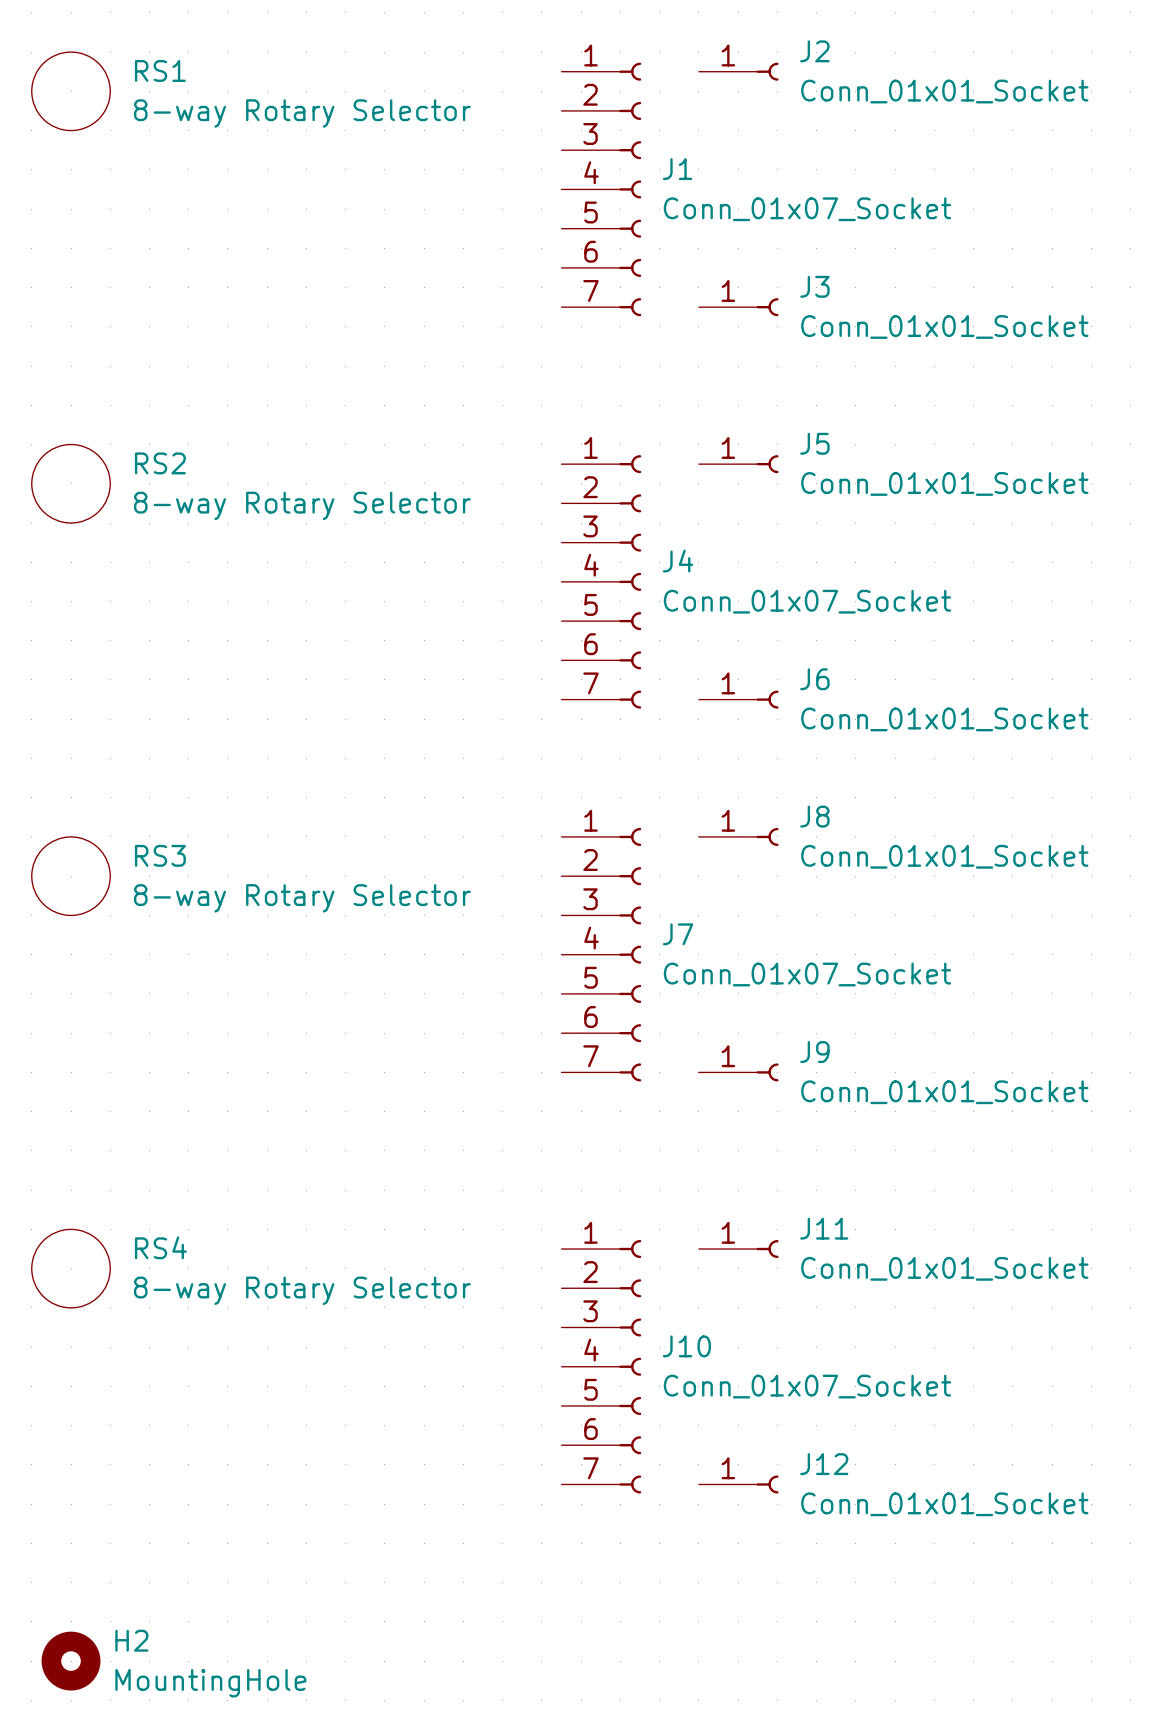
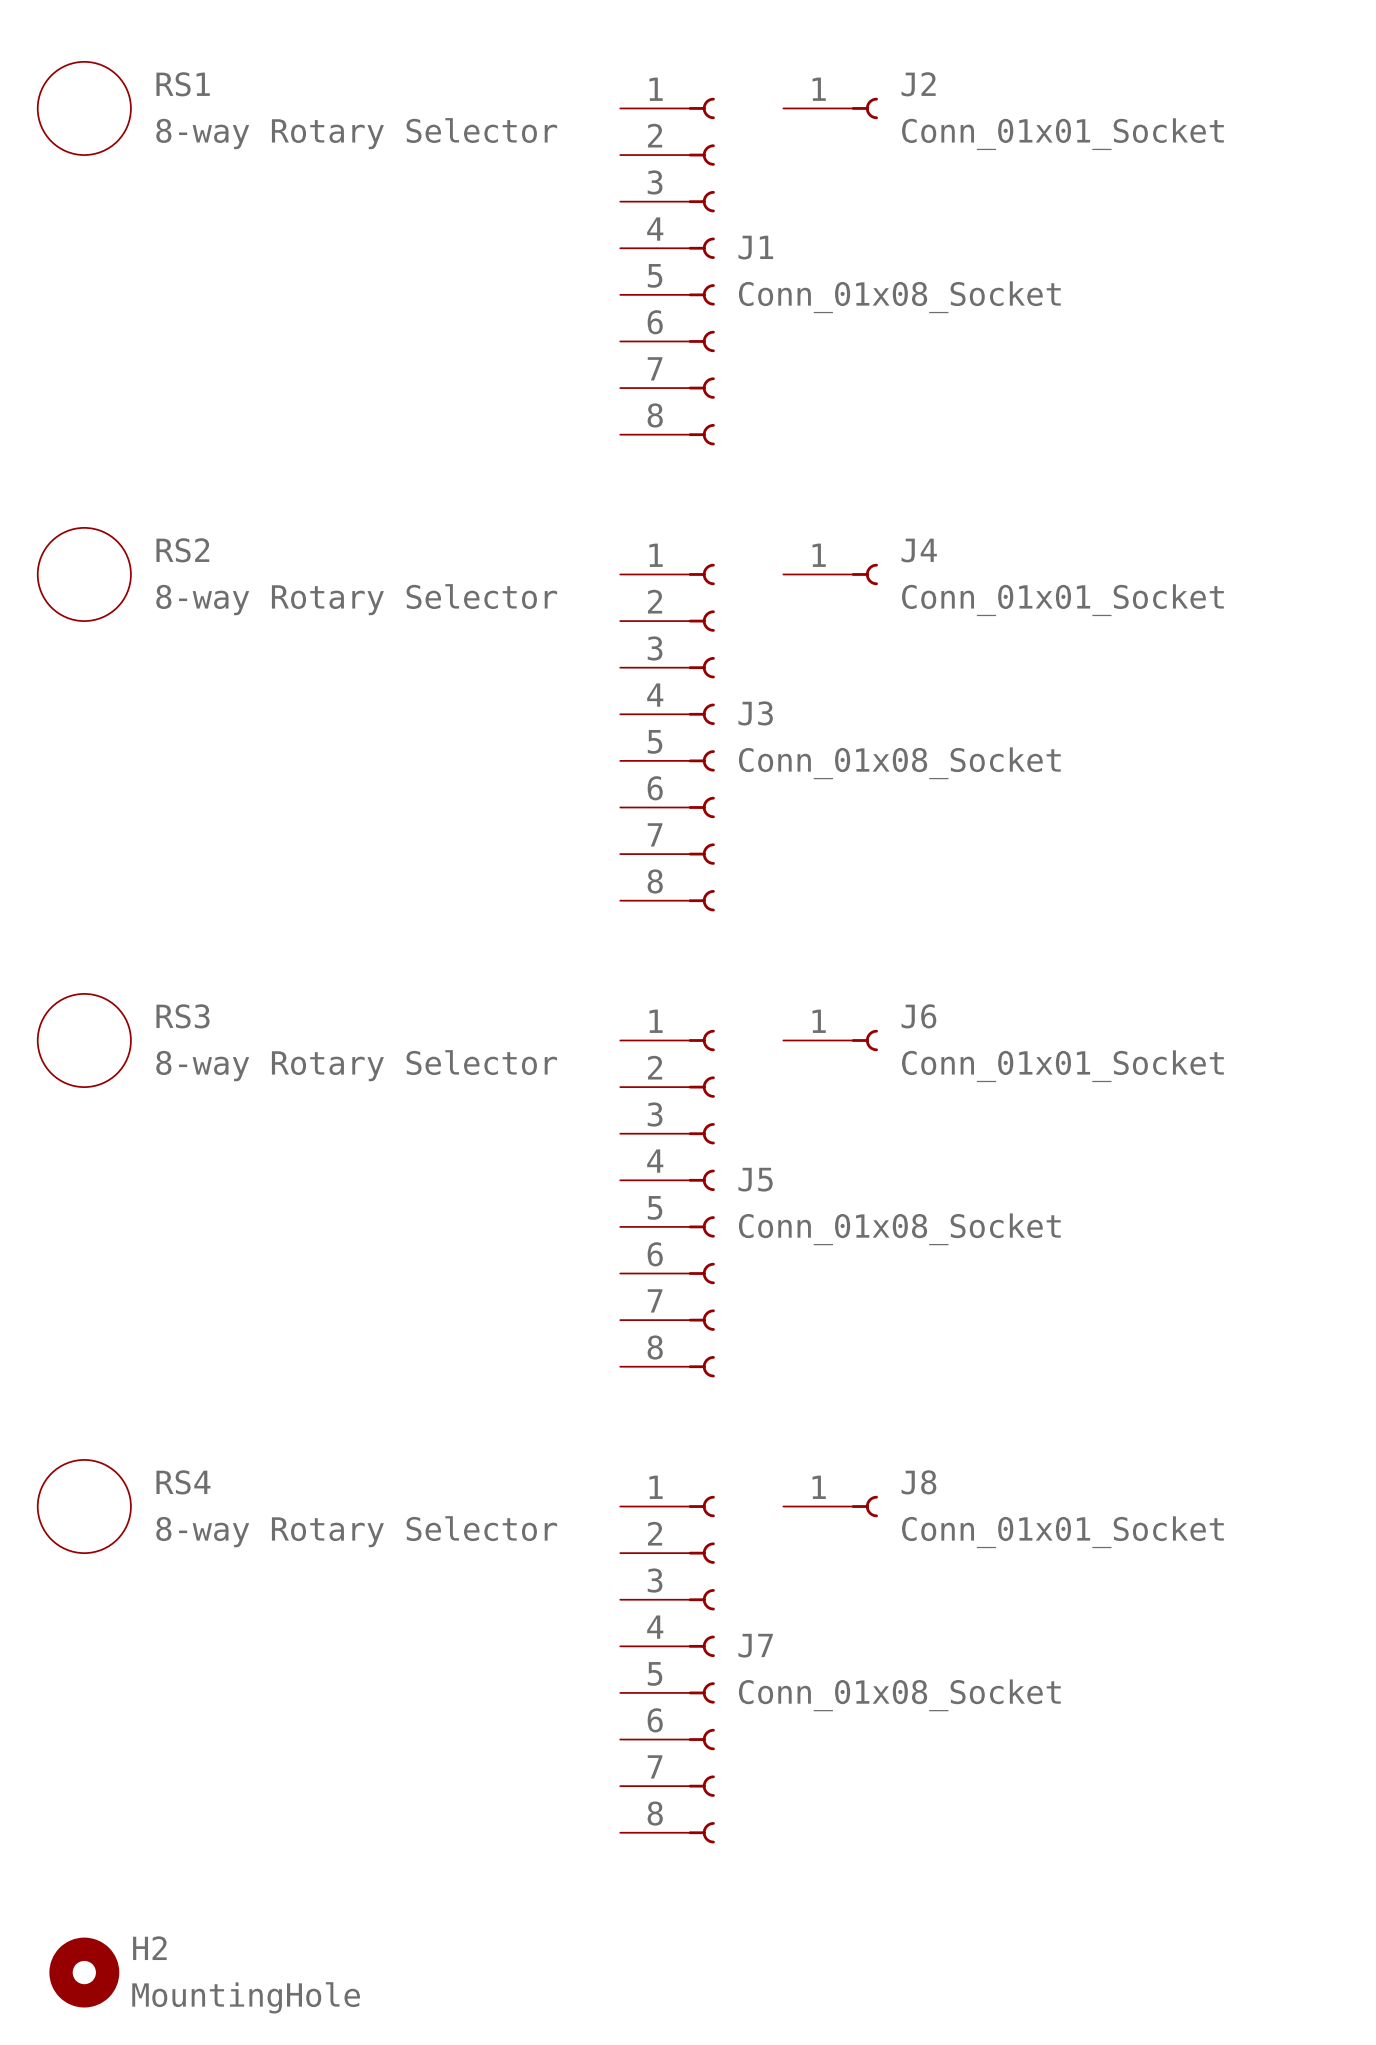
J1 symbol: [561, 62, 642, 317] -> [620, 97, 715, 446]
J2 position: (738, 71) -> (830, 108)
J1 value: Conn_01x07_Socket (807, 209) -> Conn_01x08_Socket (899, 297)
J3 symbol: [698, 298, 779, 317] -> [620, 563, 715, 912]
J3 value: Conn_01x01_Socket (944, 326) -> Conn_01x08_Socket (899, 763)
J4 symbol: [561, 455, 642, 709] -> [783, 563, 878, 586]
J5 symbol: [698, 455, 779, 474] -> [620, 1029, 715, 1378]
J5 value: Conn_01x01_Socket (944, 483) -> Conn_01x08_Socket (899, 1229)
J4 value: Conn_01x07_Socket (807, 601) -> Conn_01x01_Socket (1062, 600)
J6 position: (738, 699) -> (830, 1040)
J7 symbol: [561, 827, 642, 1082] -> [620, 1495, 715, 1844]
J8 position: (738, 836) -> (830, 1506)
J7 value: Conn_01x07_Socket (807, 974) -> Conn_01x08_Socket (899, 1695)
J9: Conn_01x01_Socket (738, 1072) -> none
J11: Conn_01x01_Socket (738, 1249) -> none
J10: Conn_01x07_Socket (601, 1366) -> none
J12: Conn_01x01_Socket (738, 1484) -> none

